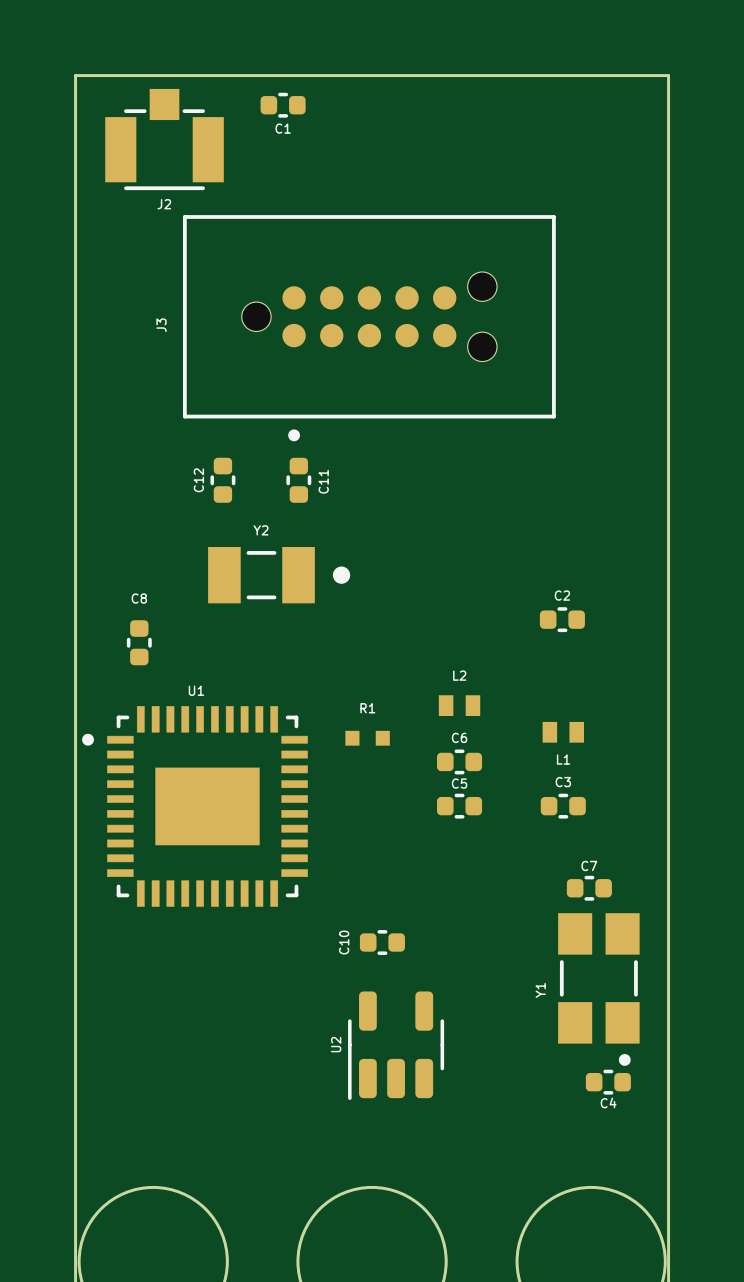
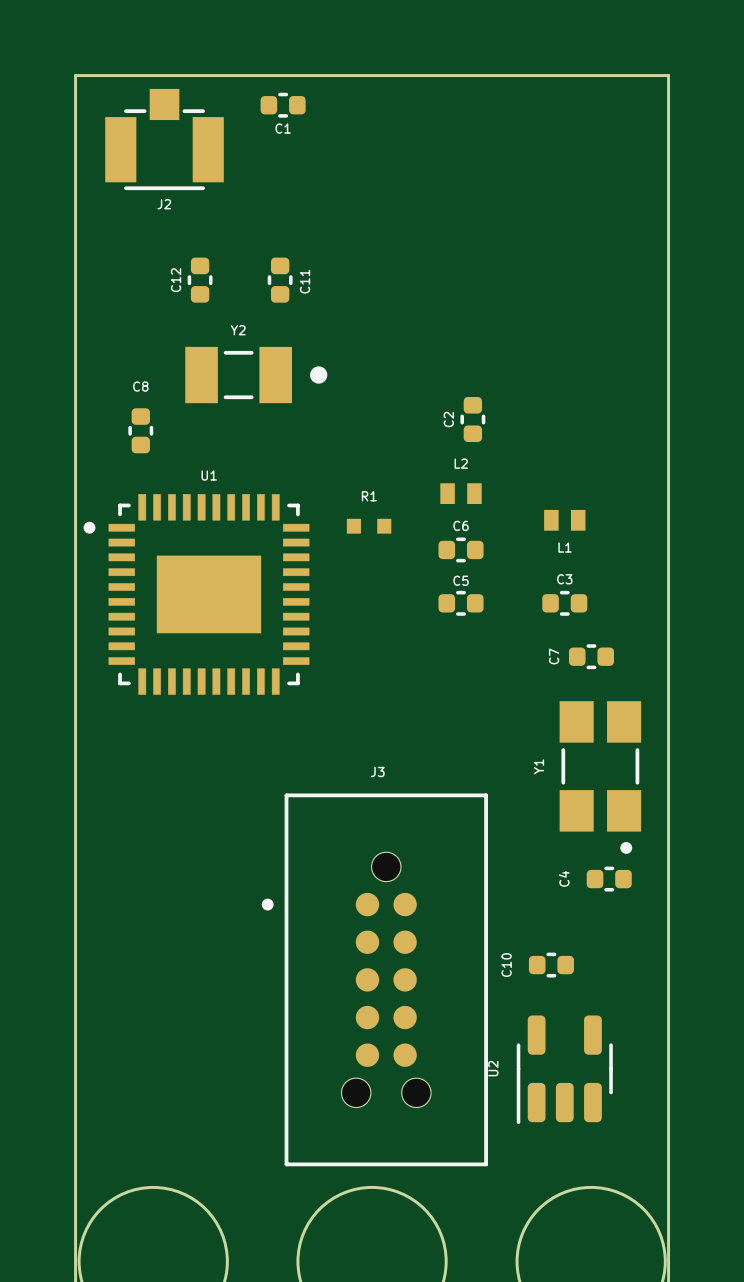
J3 rotation: 0° (369, 328) -> 90° clockwise (374, 979)
J3 position: (369, 328) -> (374, 979)
C12 position: (222, 480) -> (200, 280)
C11 position: (298, 480) -> (280, 280)
Y2 position: (279, 575) -> (256, 375)
C2 rotation: 0° (562, 619) -> 90° clockwise (472, 419)
C2 position: (562, 619) -> (472, 419)
C8 position: (139, 642) -> (140, 430)
U1 name position: U1 (196, 690) -> U1 (209, 475)
L2 position: (459, 705) -> (461, 493)
L1 position: (563, 732) -> (564, 520)
R1 position: (367, 738) -> (369, 526)
C6 position: (459, 761) -> (461, 549)
U1 position: (194, 806) -> (196, 594)
C5 position: (459, 806) -> (461, 603)
C3 position: (563, 806) -> (564, 603)
C7 name rotation: 0° (589, 865) -> 90° counterclockwise (554, 656)
C7 name position: C7 (589, 865) -> C7 (554, 656)
C7 position: (589, 888) -> (591, 656)
C10 name position: C10 (344, 942) -> C10 (506, 965)
C10 position: (382, 942) -> (551, 965)
Y1 position: (598, 989) -> (600, 777)
Y1 name position: Y1 (540, 990) -> Y1 (538, 766)
U2 name position: U2 (336, 1044) -> U2 (493, 1068)
U2 position: (396, 1045) -> (564, 1069)
C4 position: (608, 1082) -> (609, 879)
C4 name rotation: 0° (608, 1102) -> 90° counterclockwise (564, 878)
C4 name position: C4 (608, 1102) -> C4 (564, 878)

